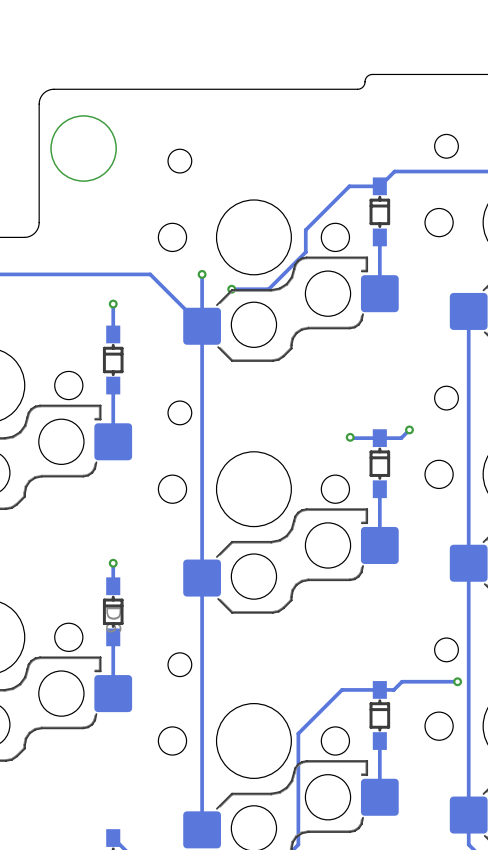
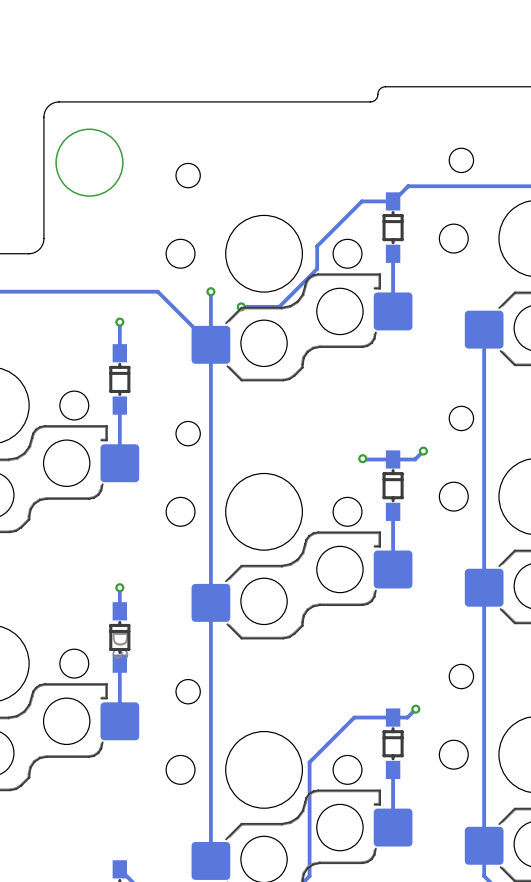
track: (457, 681) (402, 681) -> none
via position: (457, 681) -> (415, 709)

